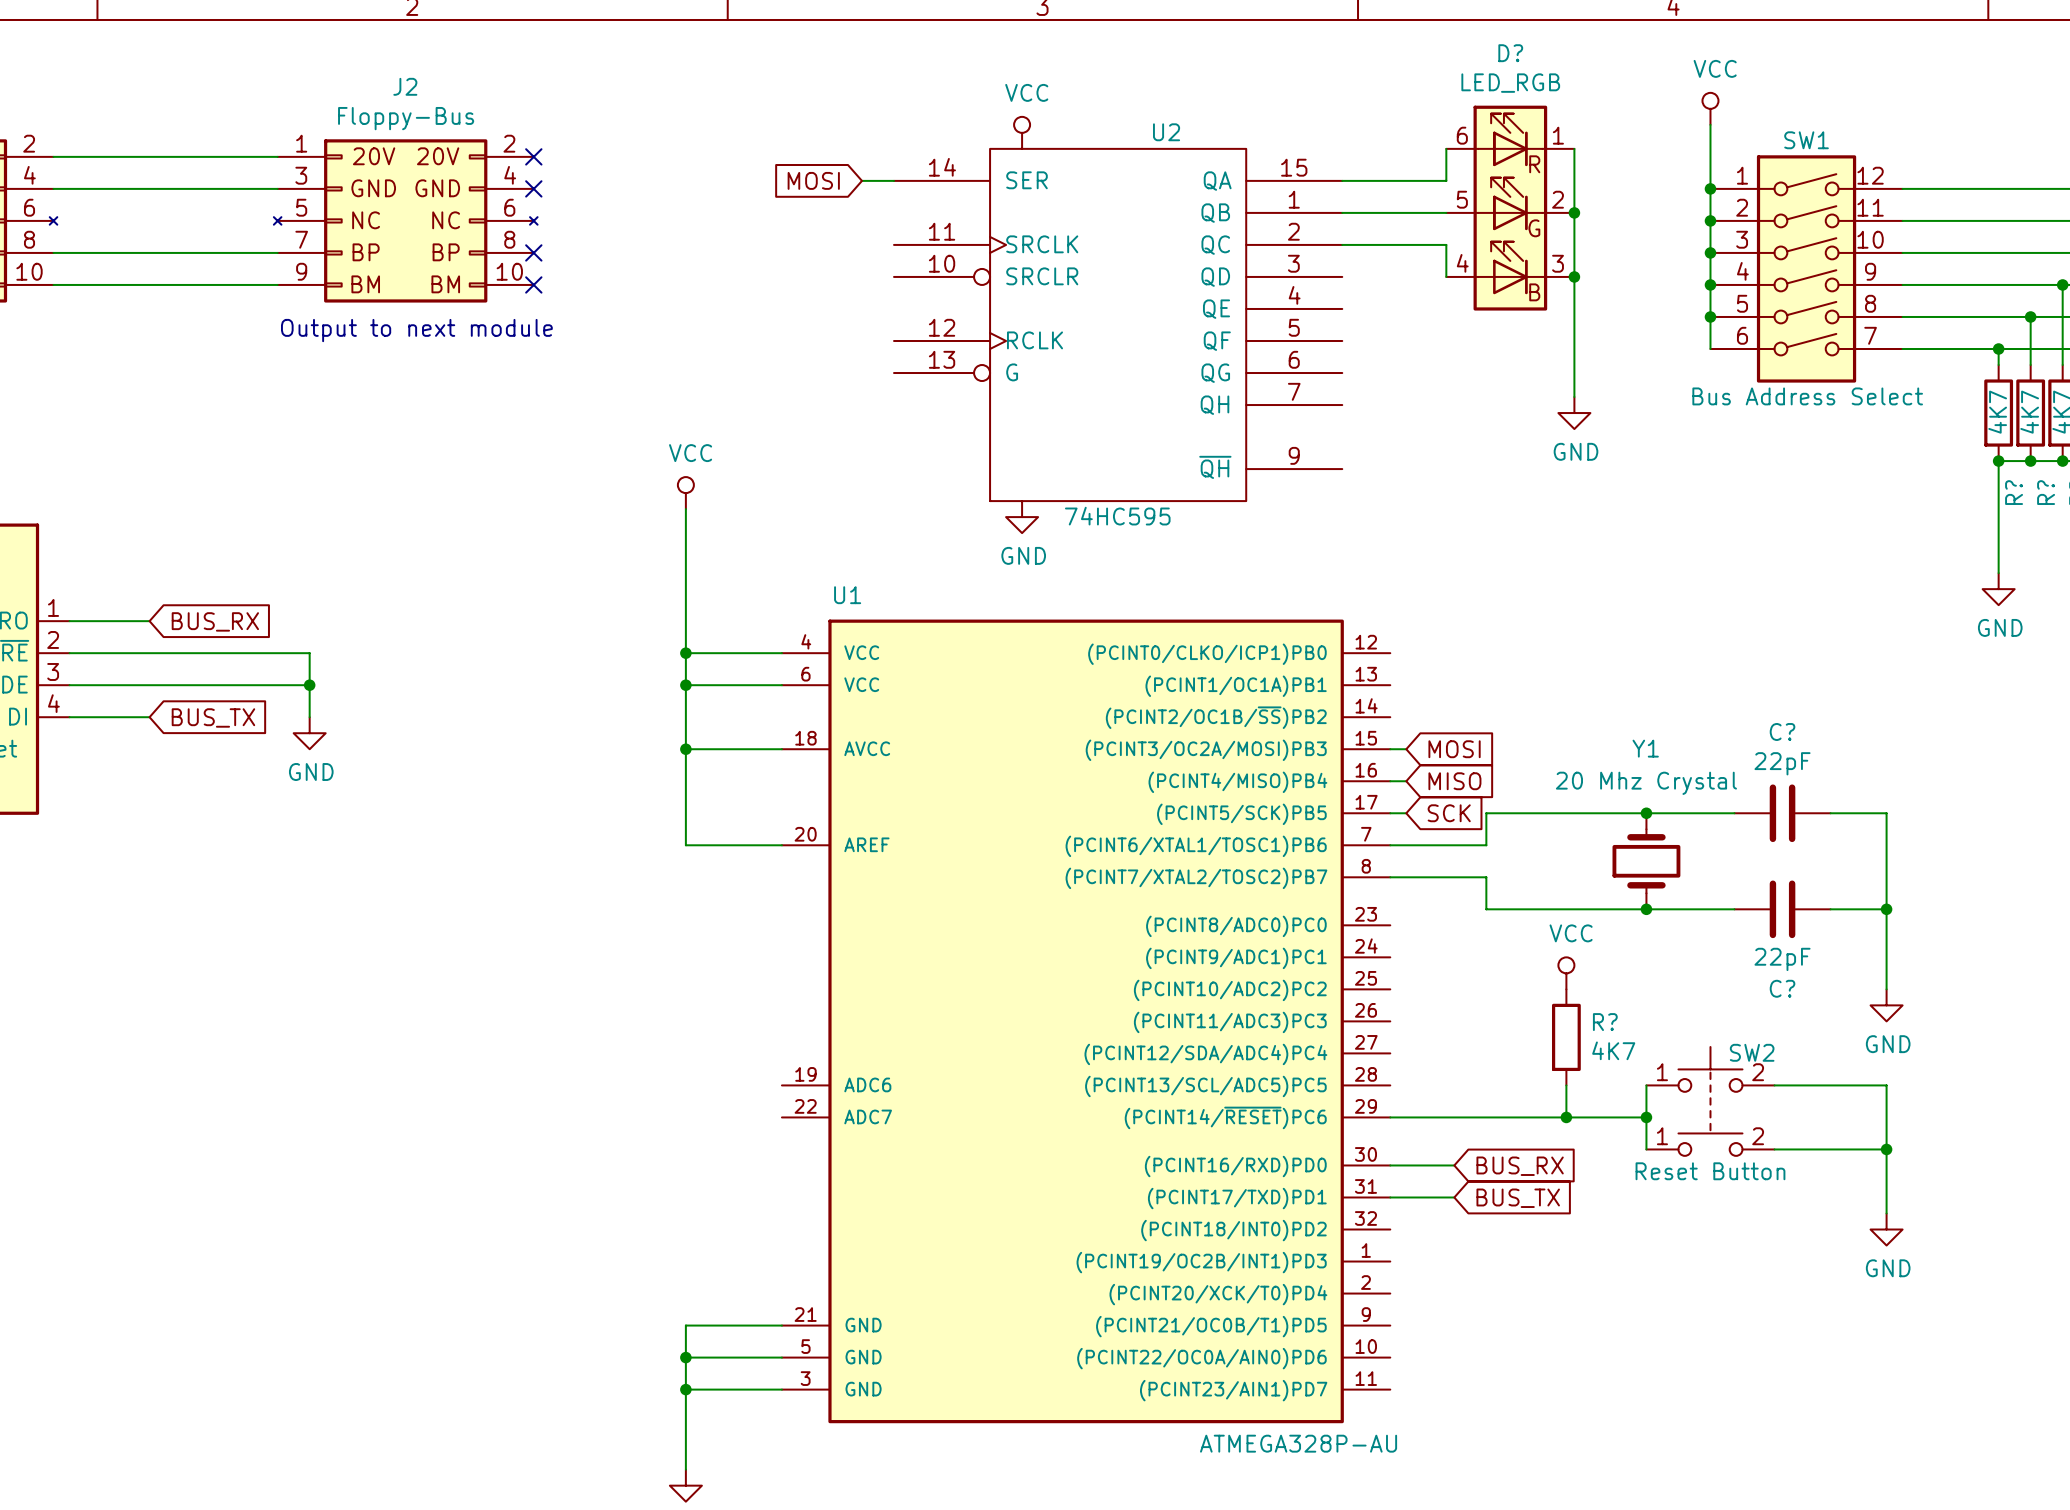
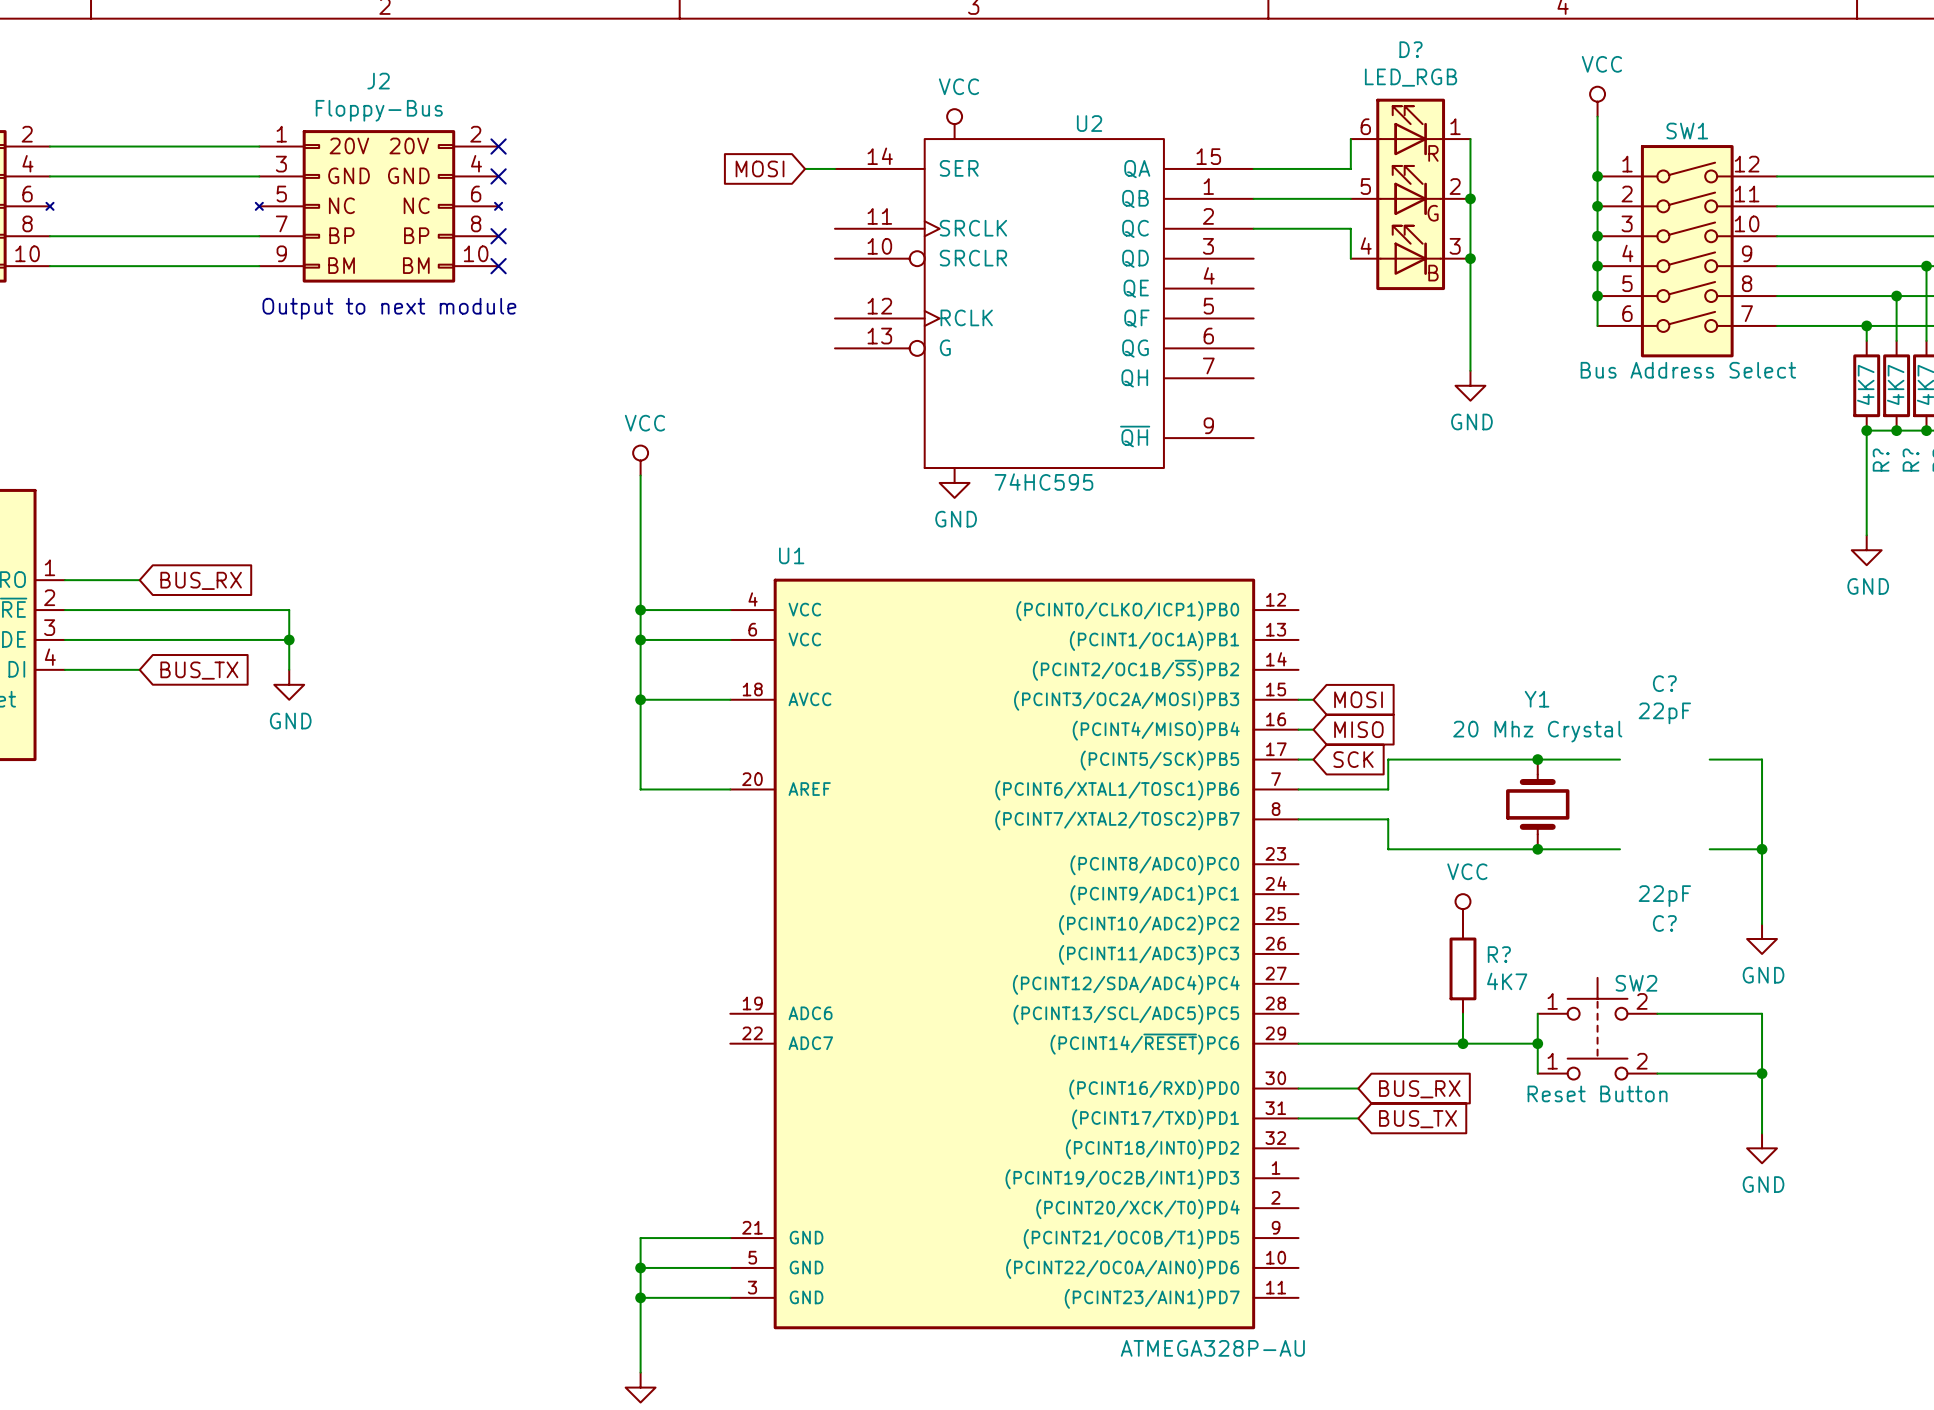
C?: 22pF (1782, 813) -> none
C?: 22pF (1782, 909) -> none

